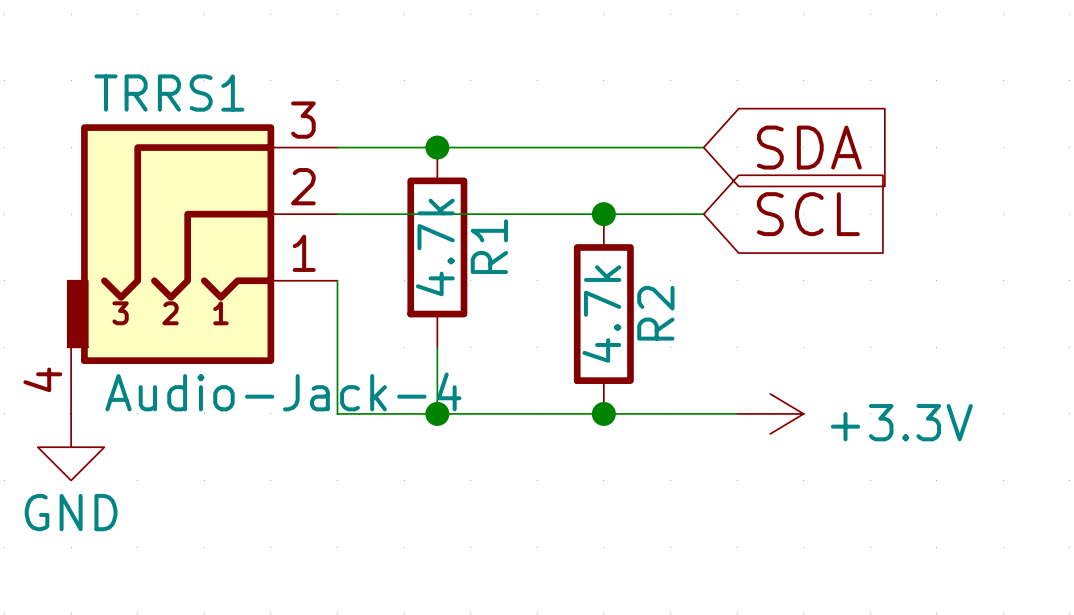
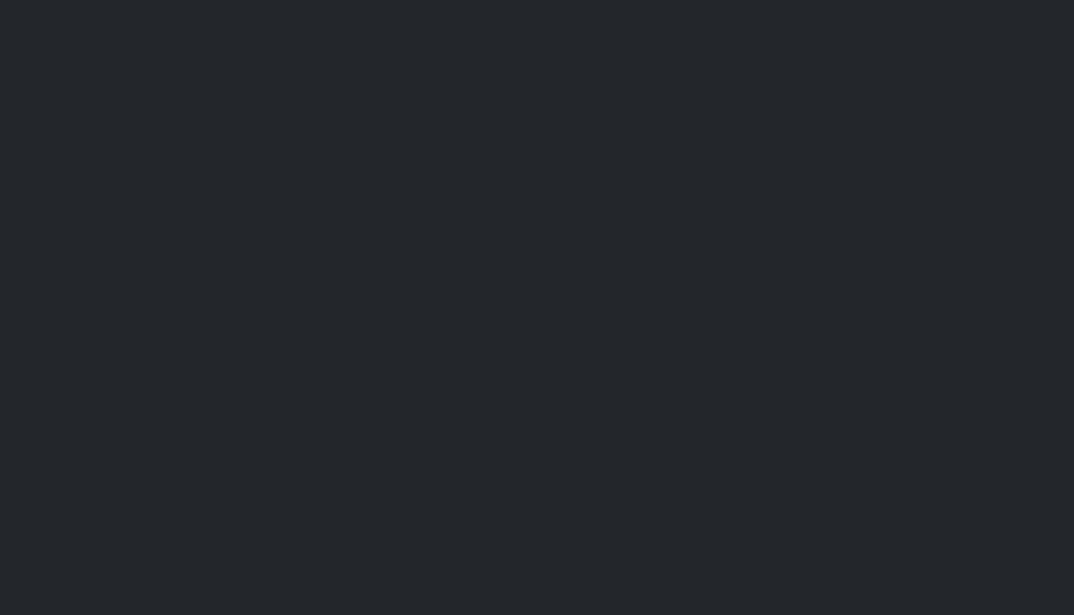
wire: (337, 147) (703, 147) -> none
junction: (437, 147) -> none
global label: SDA (809, 147) -> none
wire: (337, 214) (703, 214) -> none
junction: (603, 214) -> none
global label: SCL (808, 214) -> none
R1: 4.7k (437, 247) -> none
TRRS1: Audio-Jack-4 (202, 269) -> none
wire: (337, 280) (337, 413) (737, 413) -> none
R2: 4.7k (603, 314) -> none
wire: (437, 347) (437, 413) -> none
junction: (437, 413) -> none
junction: (603, 413) -> none
power symbol: +3.3V (770, 413) -> none
power symbol: GND (71, 447) -> none

